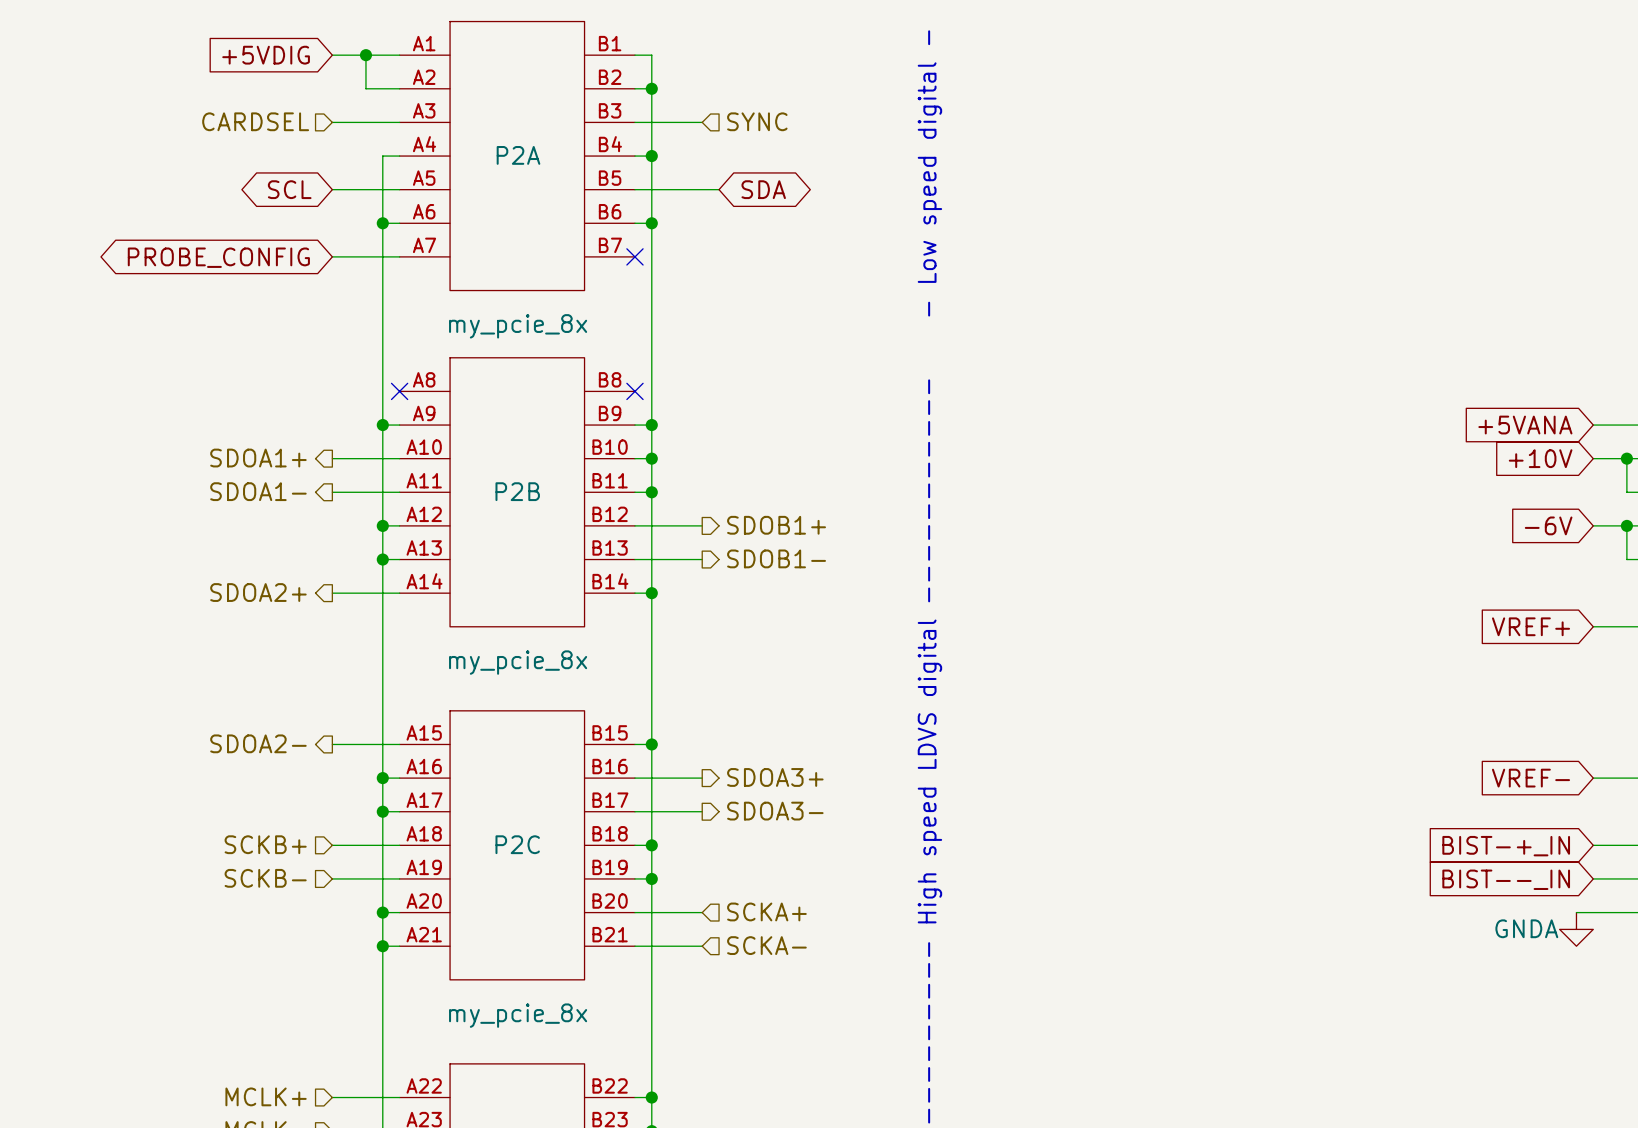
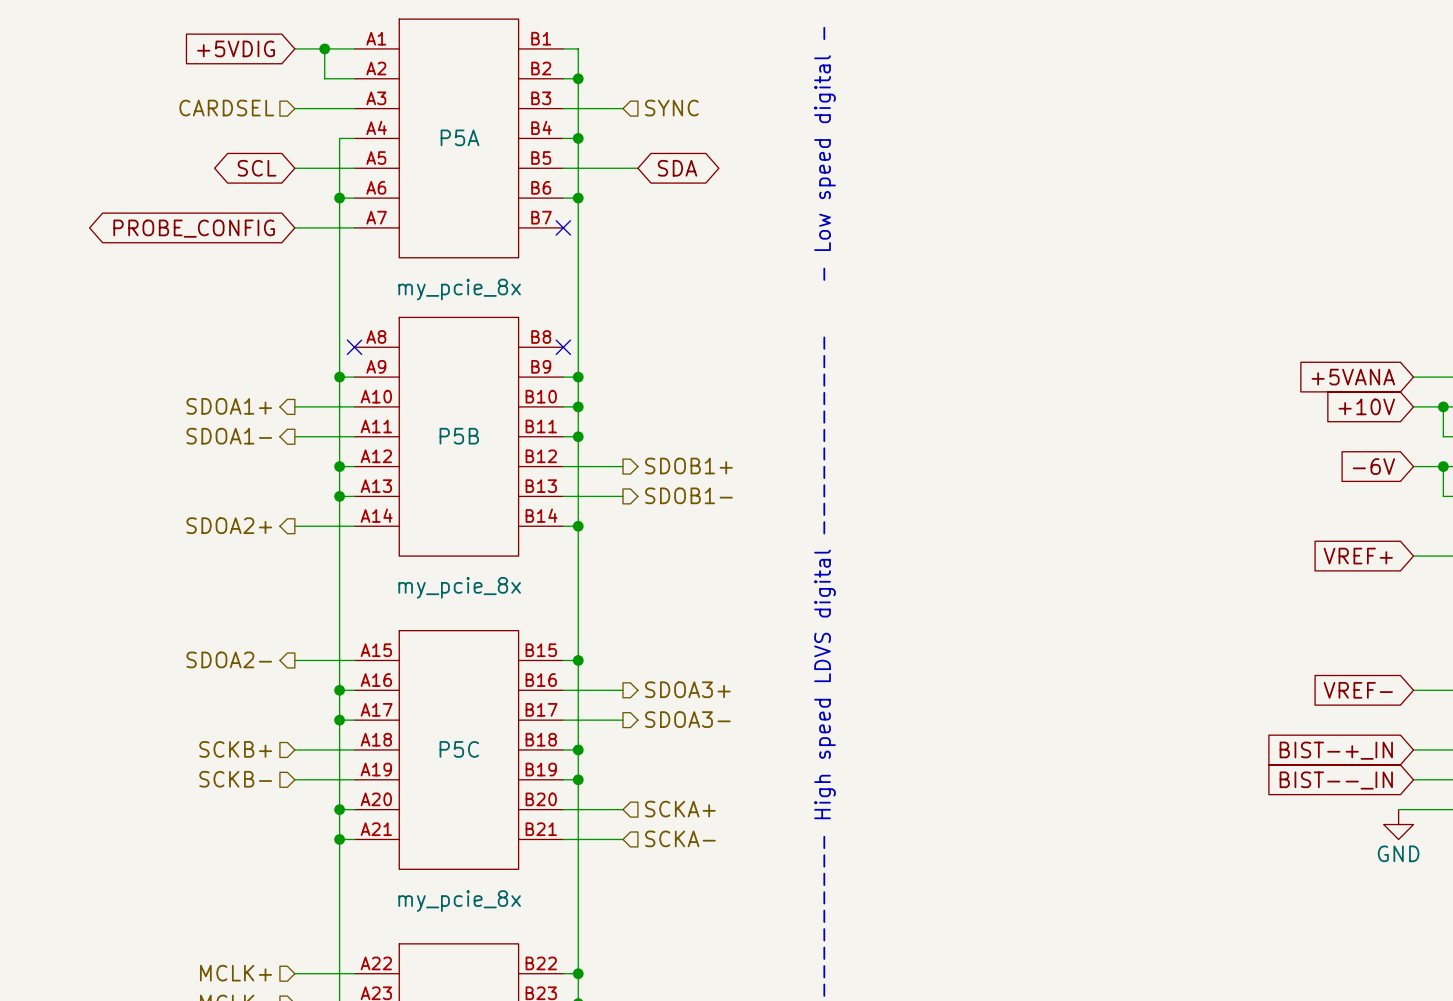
P2A name: P2A (518, 155) -> P5A (459, 137)
P2B name: P2B (517, 491) -> P5B (459, 436)
P2C name: P2C (517, 844) -> P5C (459, 749)
power symbol: GNDA (1576, 929) -> GND (1398, 824)

